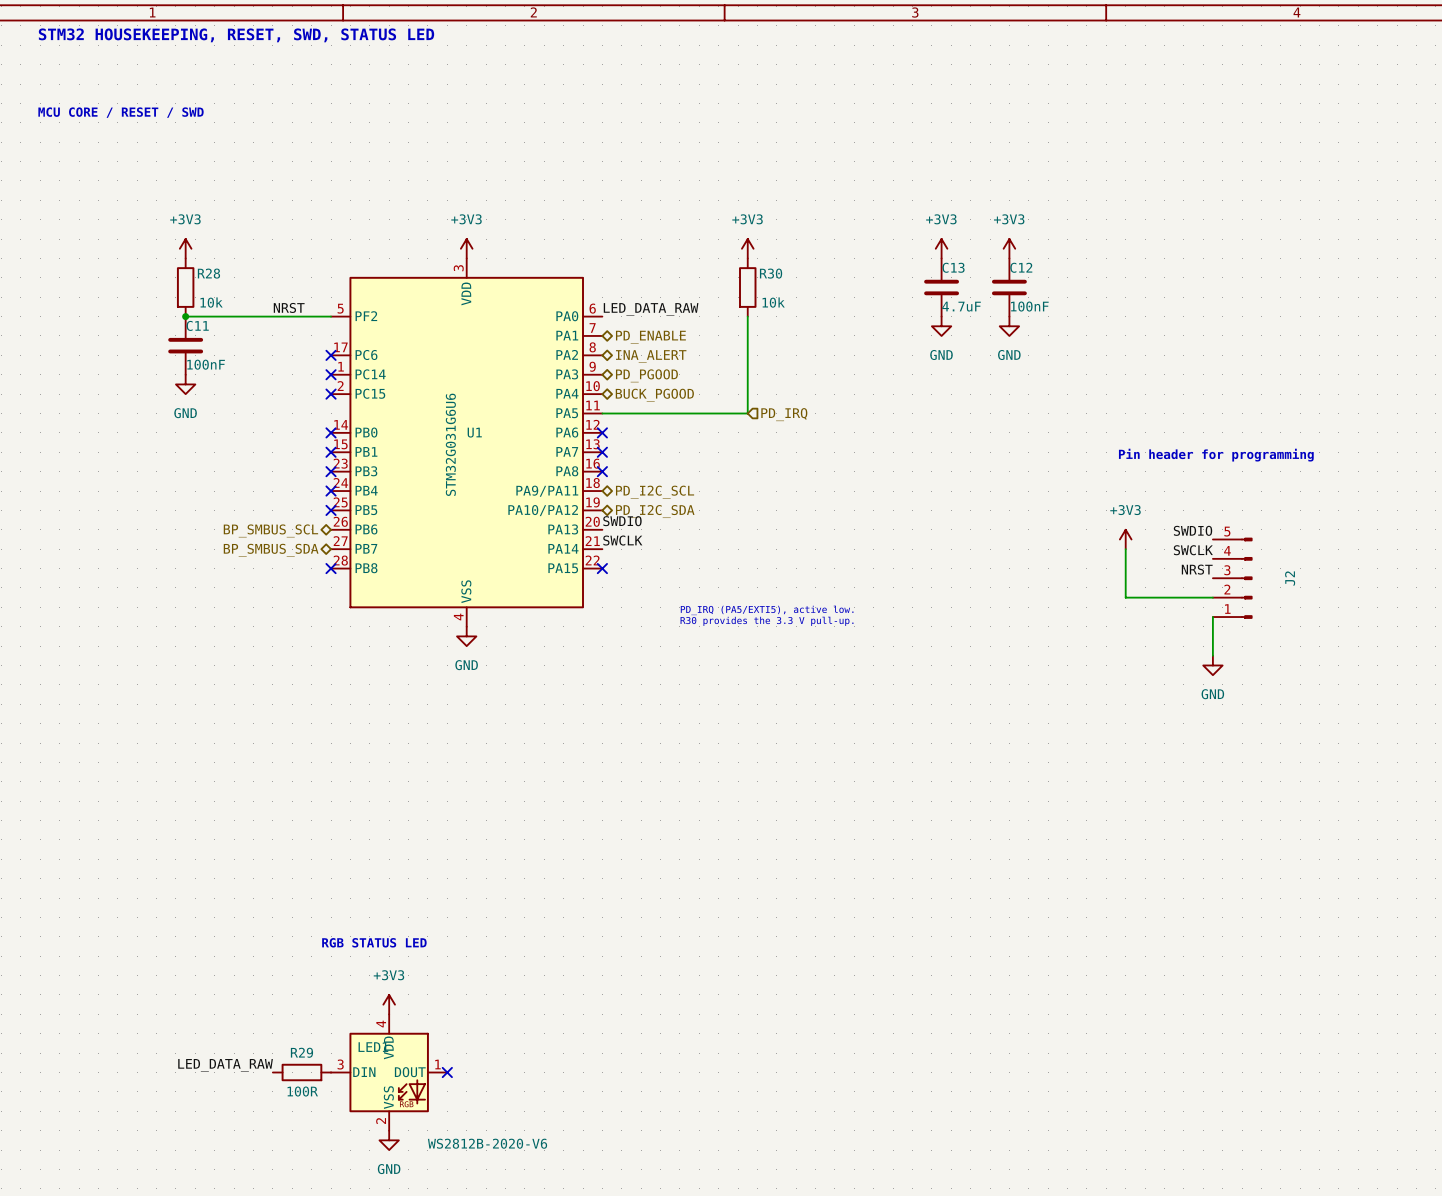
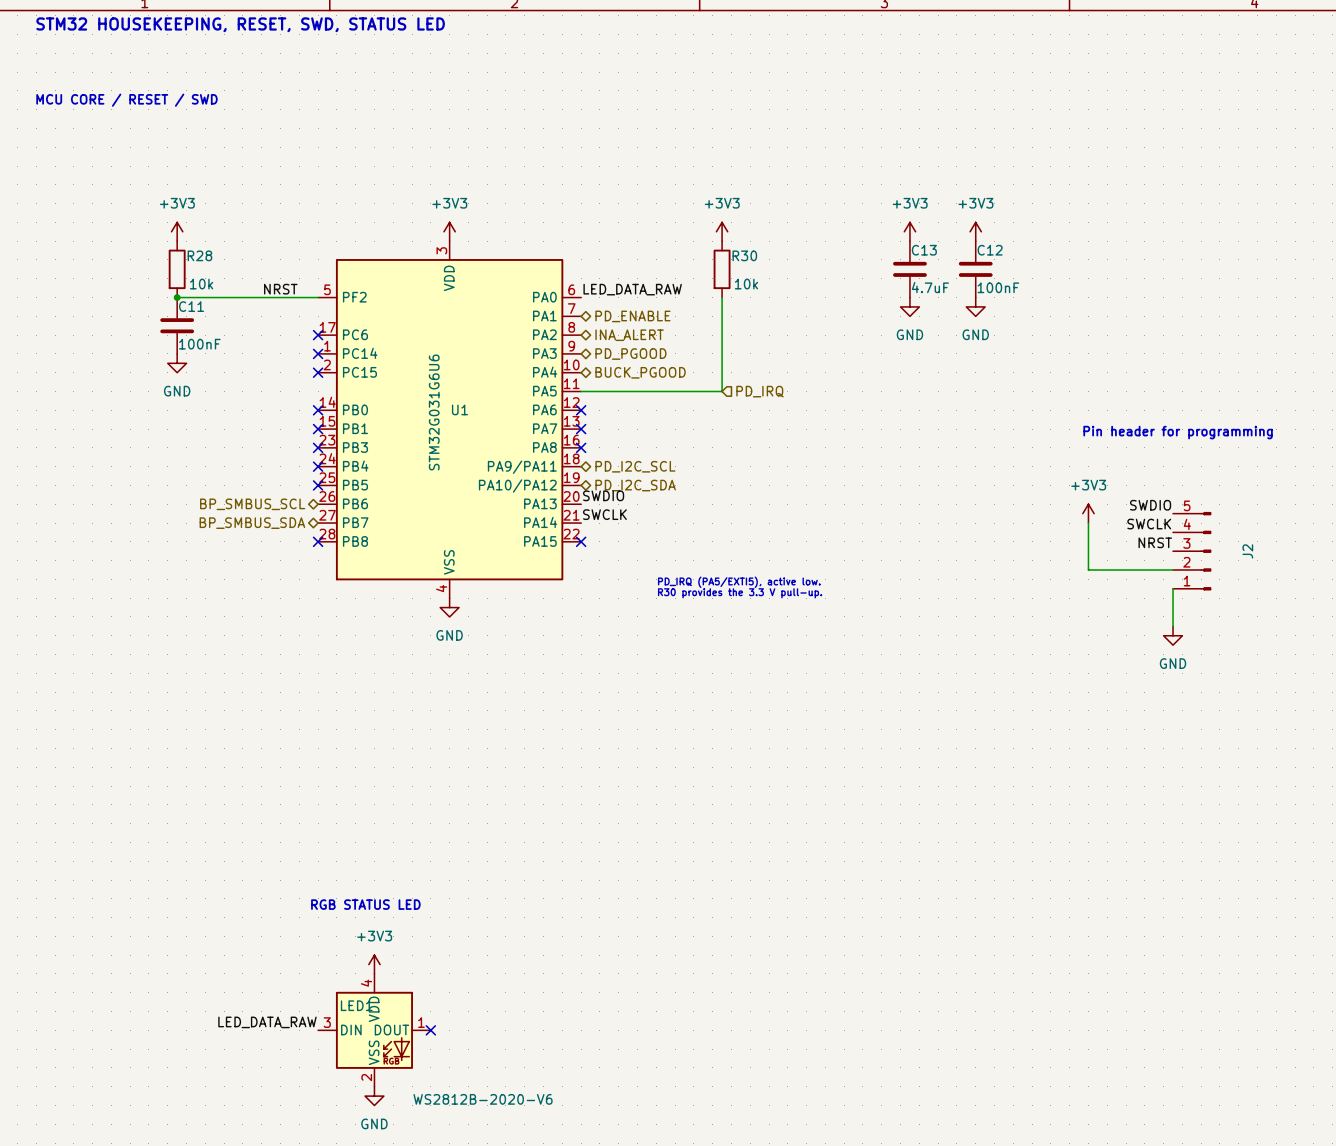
label position: LED_DATA_RAW (225, 1065) -> LED_DATA_RAW (267, 1022)
R29: 100R (301, 1072) -> none

